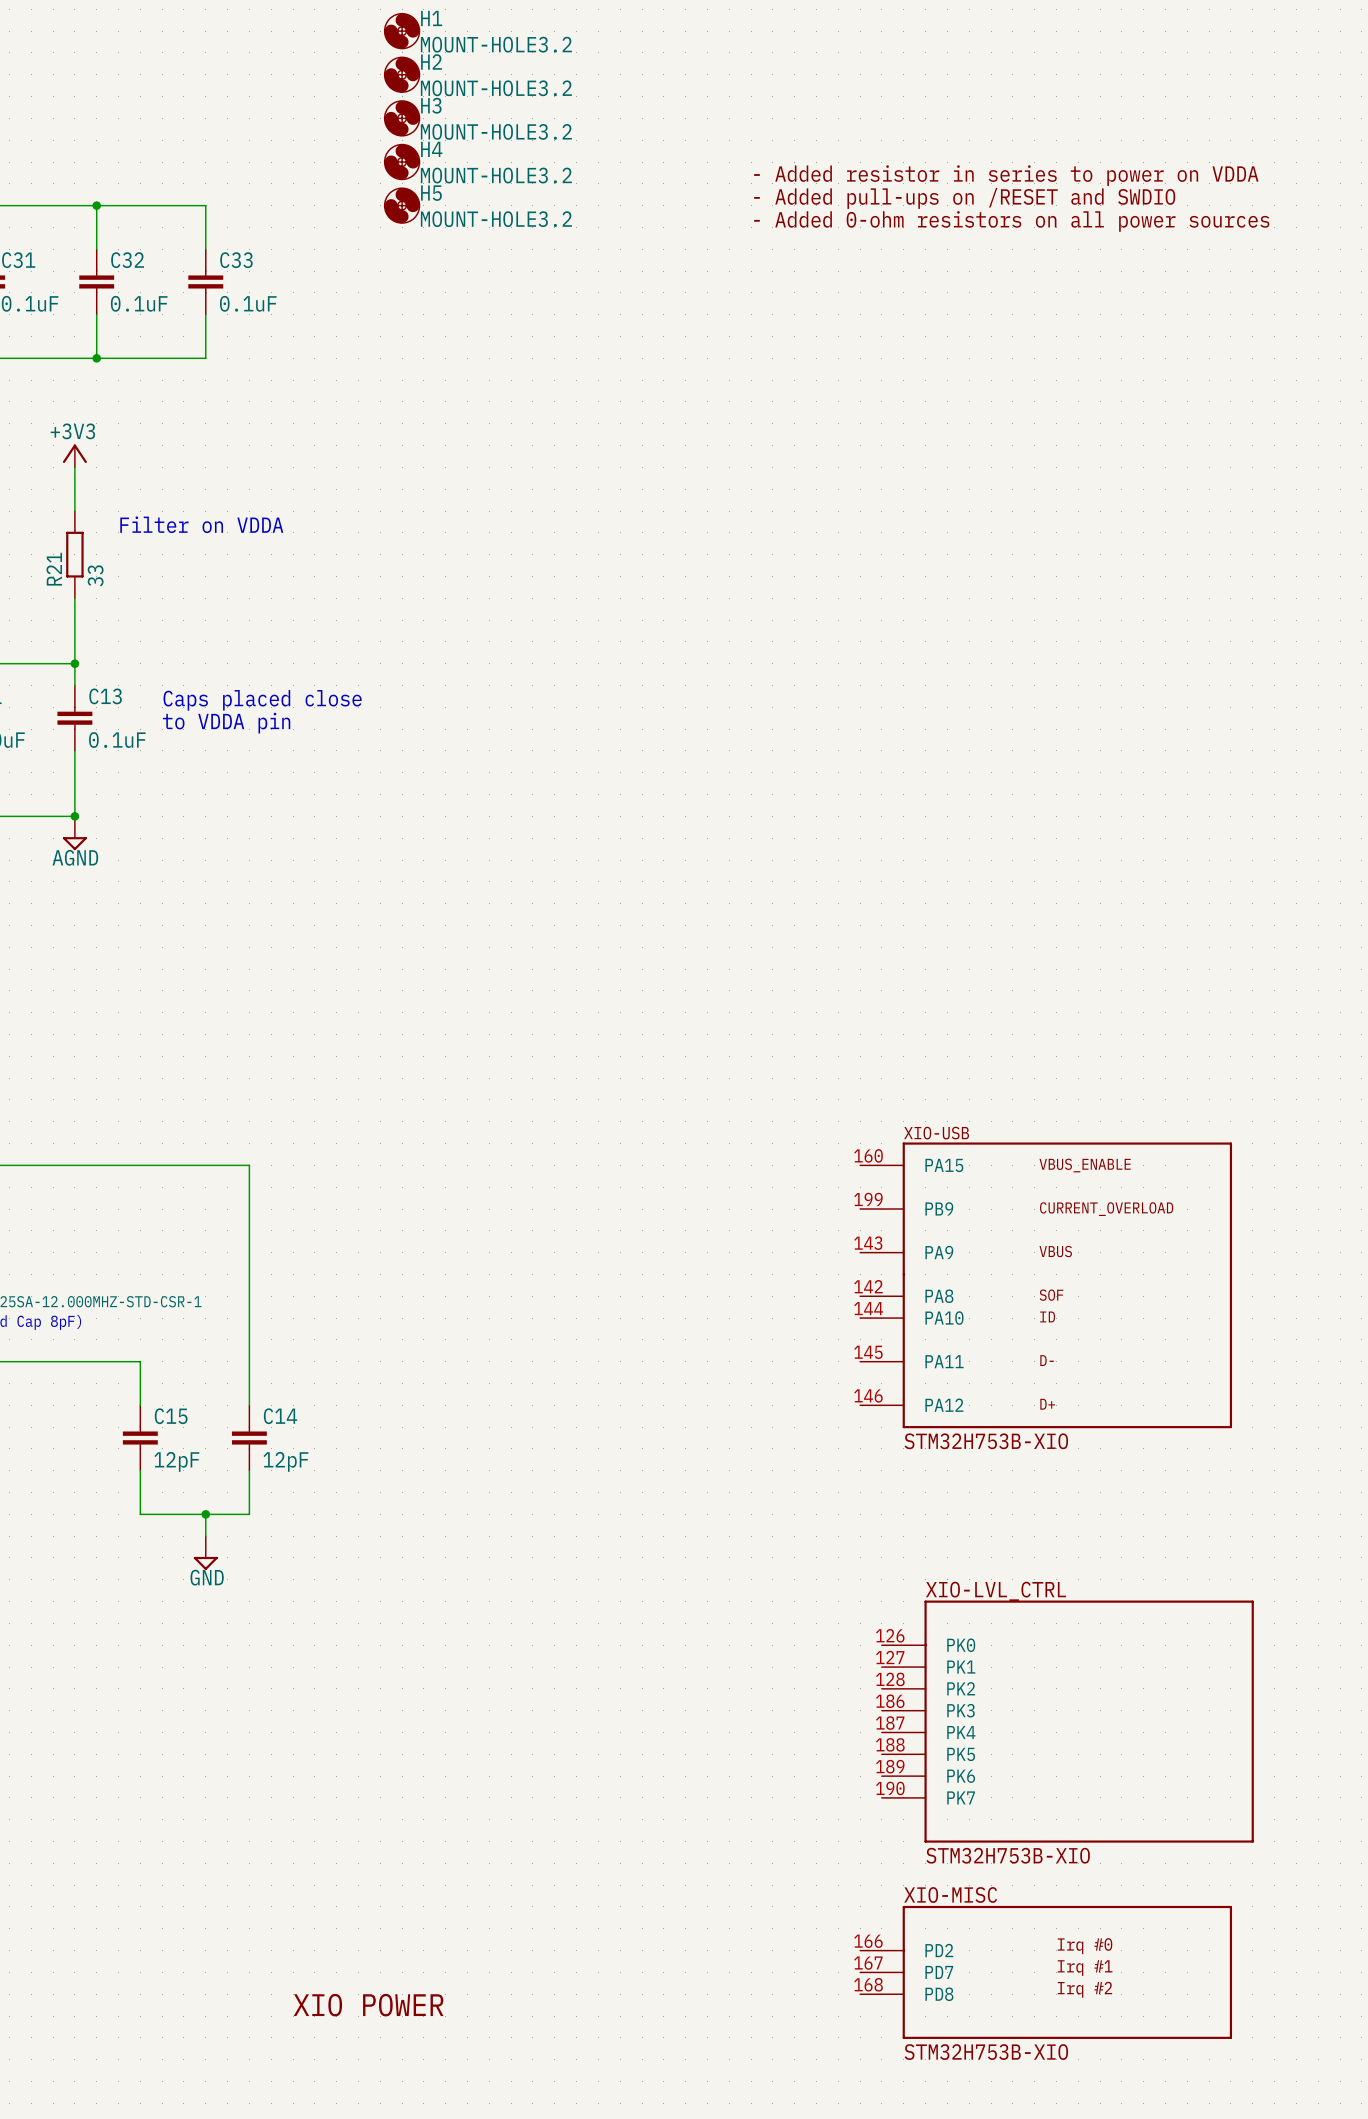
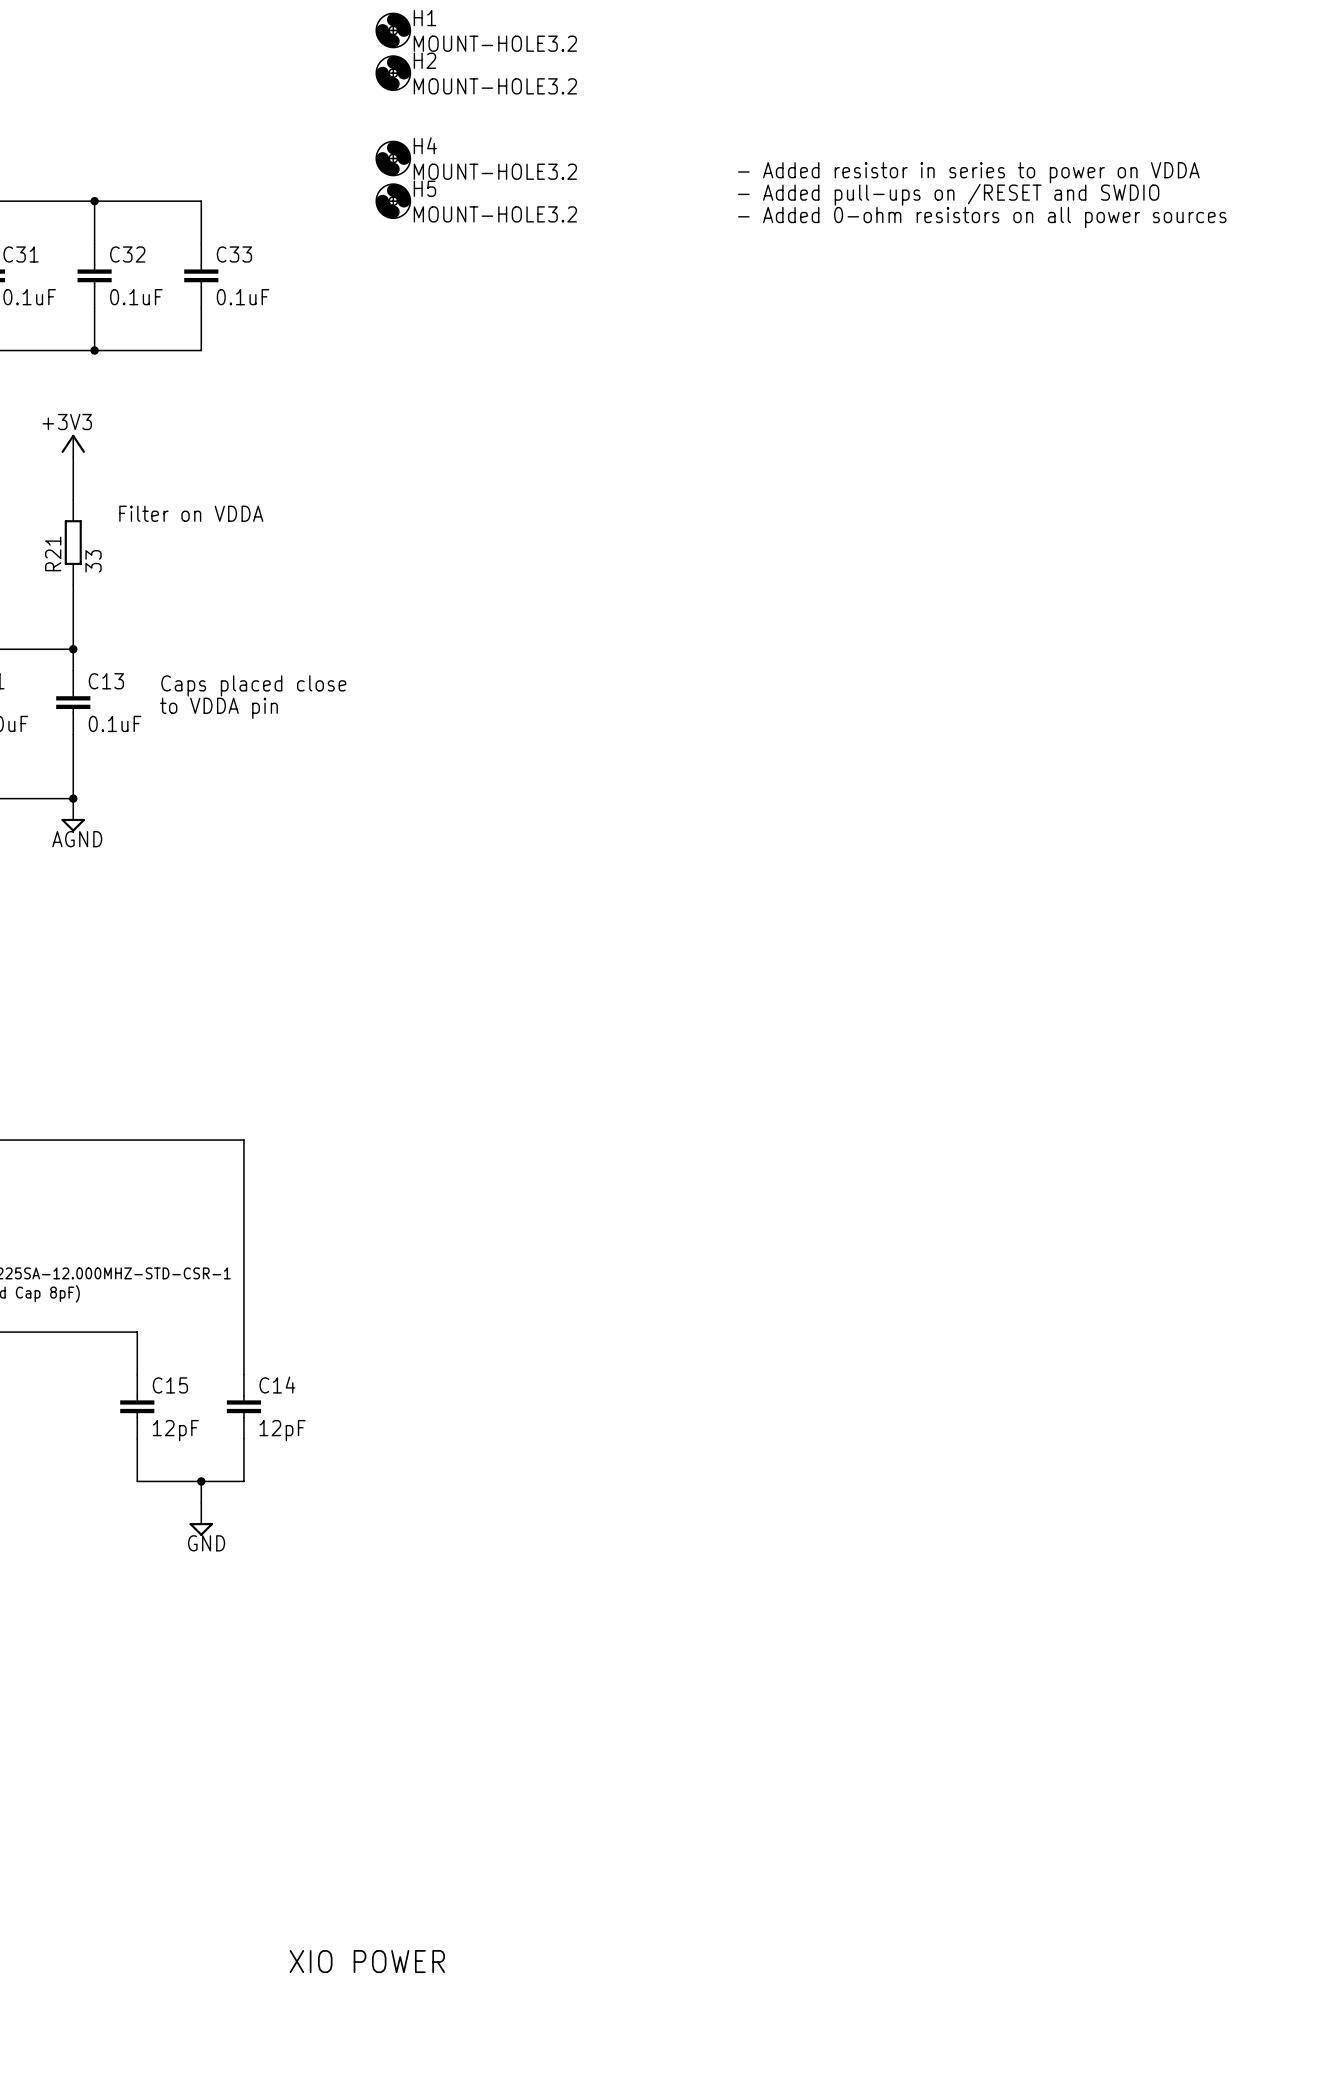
H3: MOUNT-HOLE3.2 (402, 118) -> none
XIO-USB: STM32H753B-XIO (1046, 1285) -> none
XIO-LVL_CTRL: STM32H753B-XIO (1067, 1721) -> none
XIO-MISC: STM32H753B-XIO (1046, 1972) -> none

